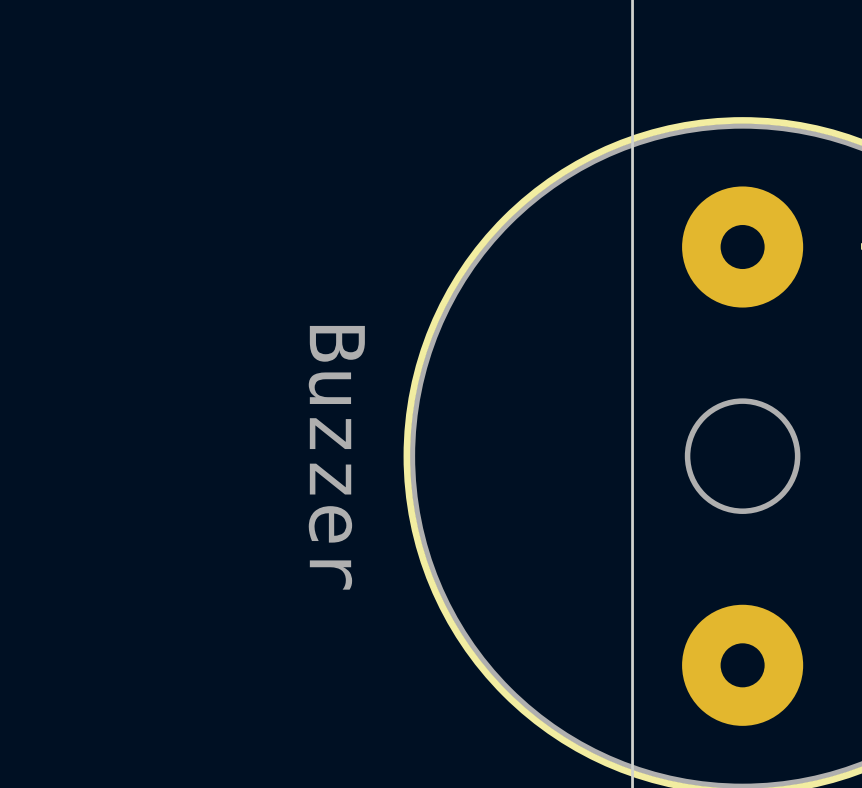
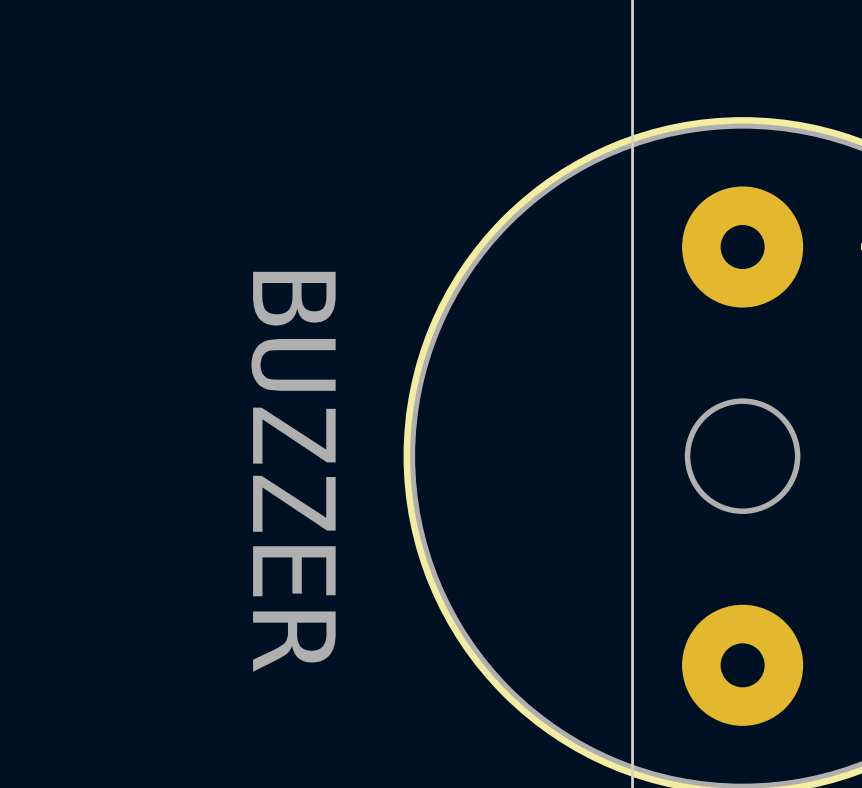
part value: Buzzer (336, 457) -> BUZZER (293, 471)

